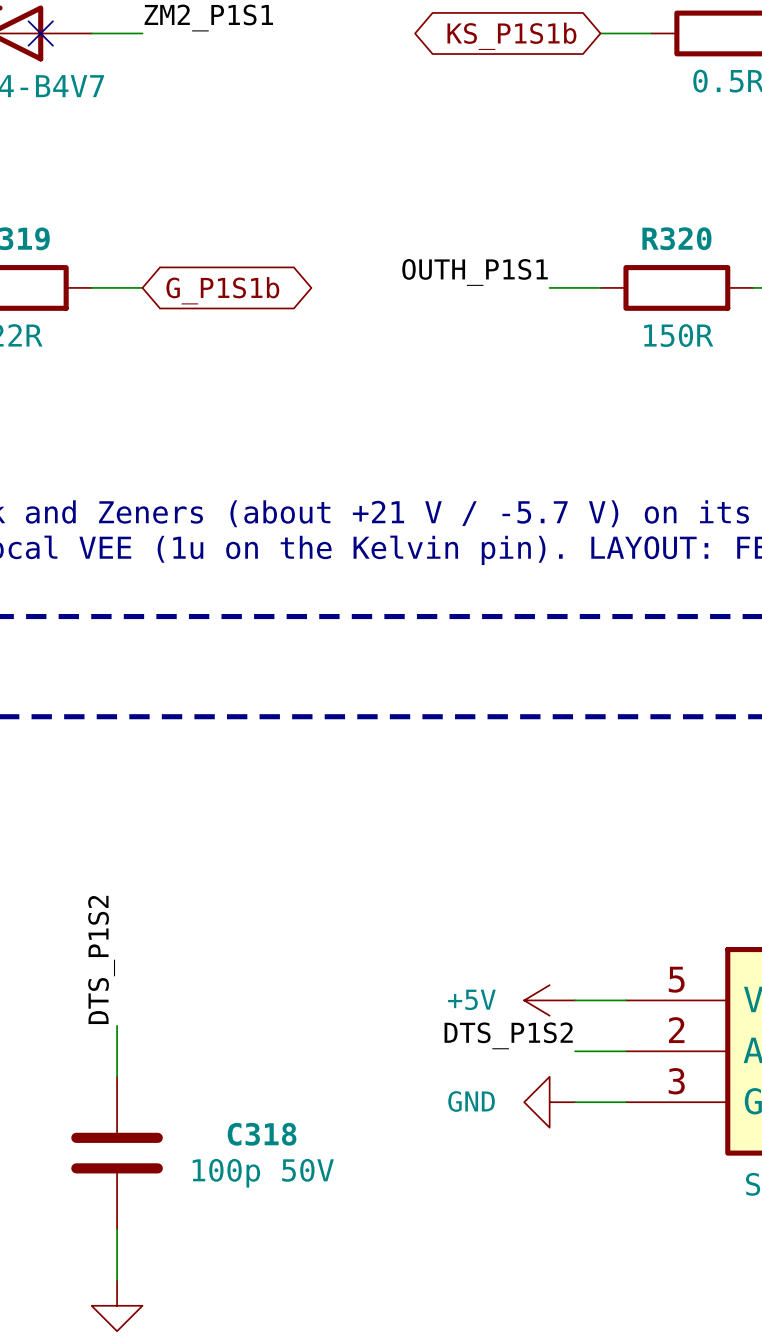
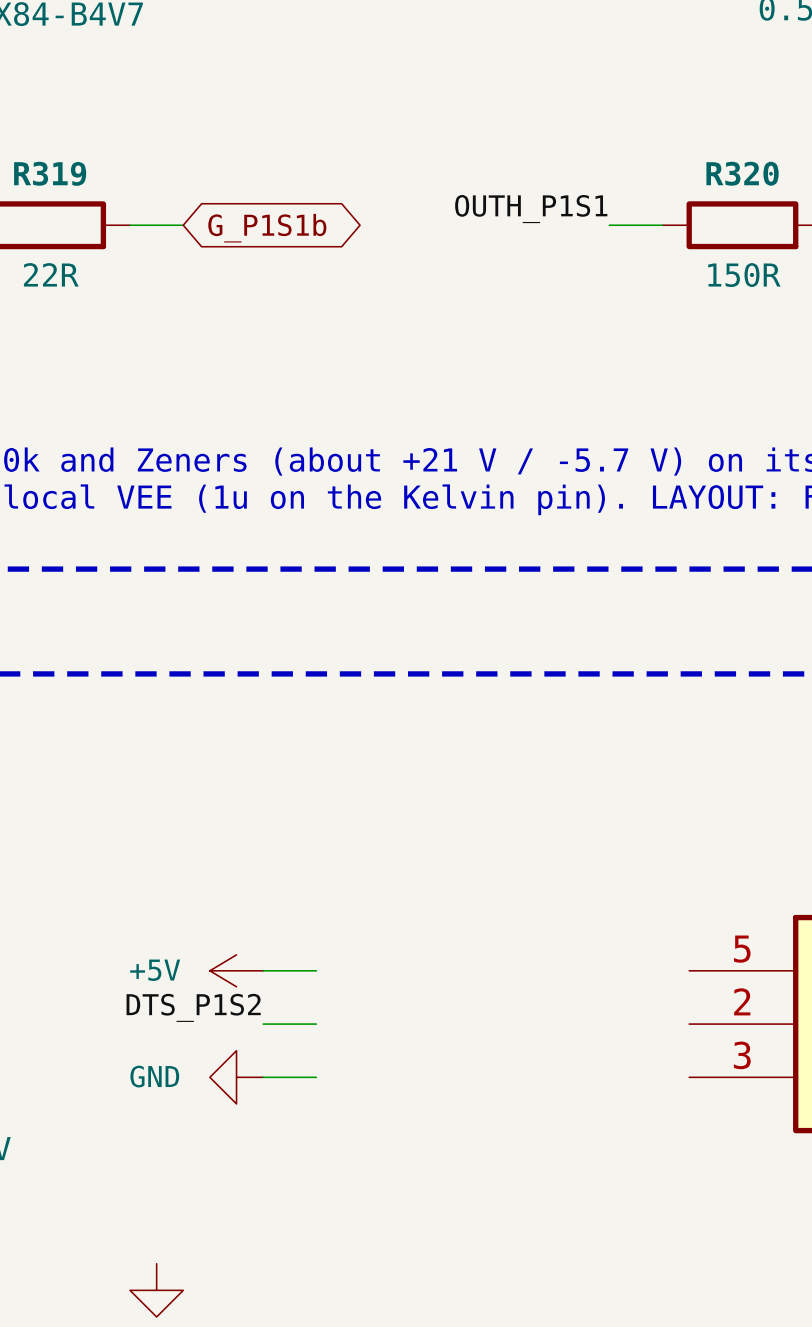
label rotation: 0° (101, 959) -> 90° clockwise (193, 1007)
power symbol: none -> +5V (236, 970)
power symbol: +5V (549, 1000) -> none
wire: (575, 1000) (625, 1000) -> (263, 970) (316, 970)
wire: (117, 1025) (117, 1076) -> none
label: DTS_P1S2 (508, 1035) -> none
wire: (575, 1051) (625, 1051) -> (263, 1024) (316, 1024)
power symbol: none -> GND (236, 1077)
power symbol: GND (549, 1102) -> none
wire: (575, 1102) (625, 1102) -> (263, 1077) (316, 1077)
C318: 100p 50V (117, 1153) -> none
wire: (117, 1229) (117, 1280) -> none

